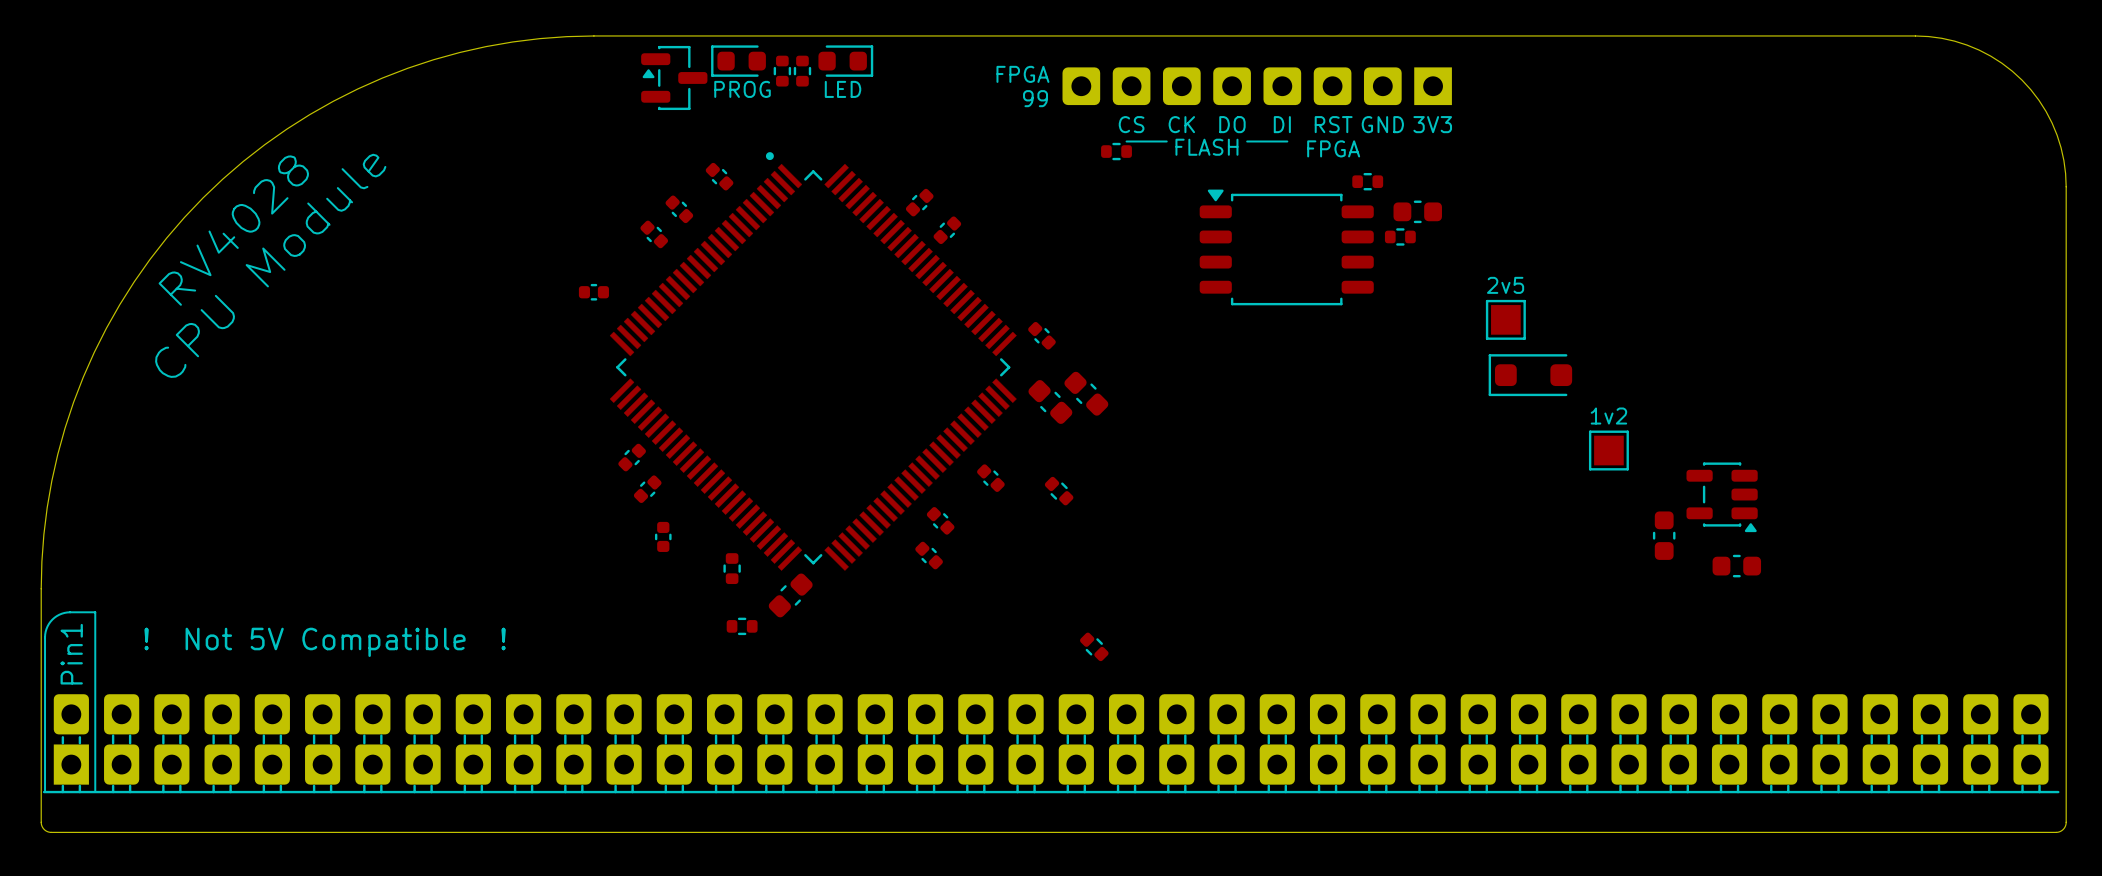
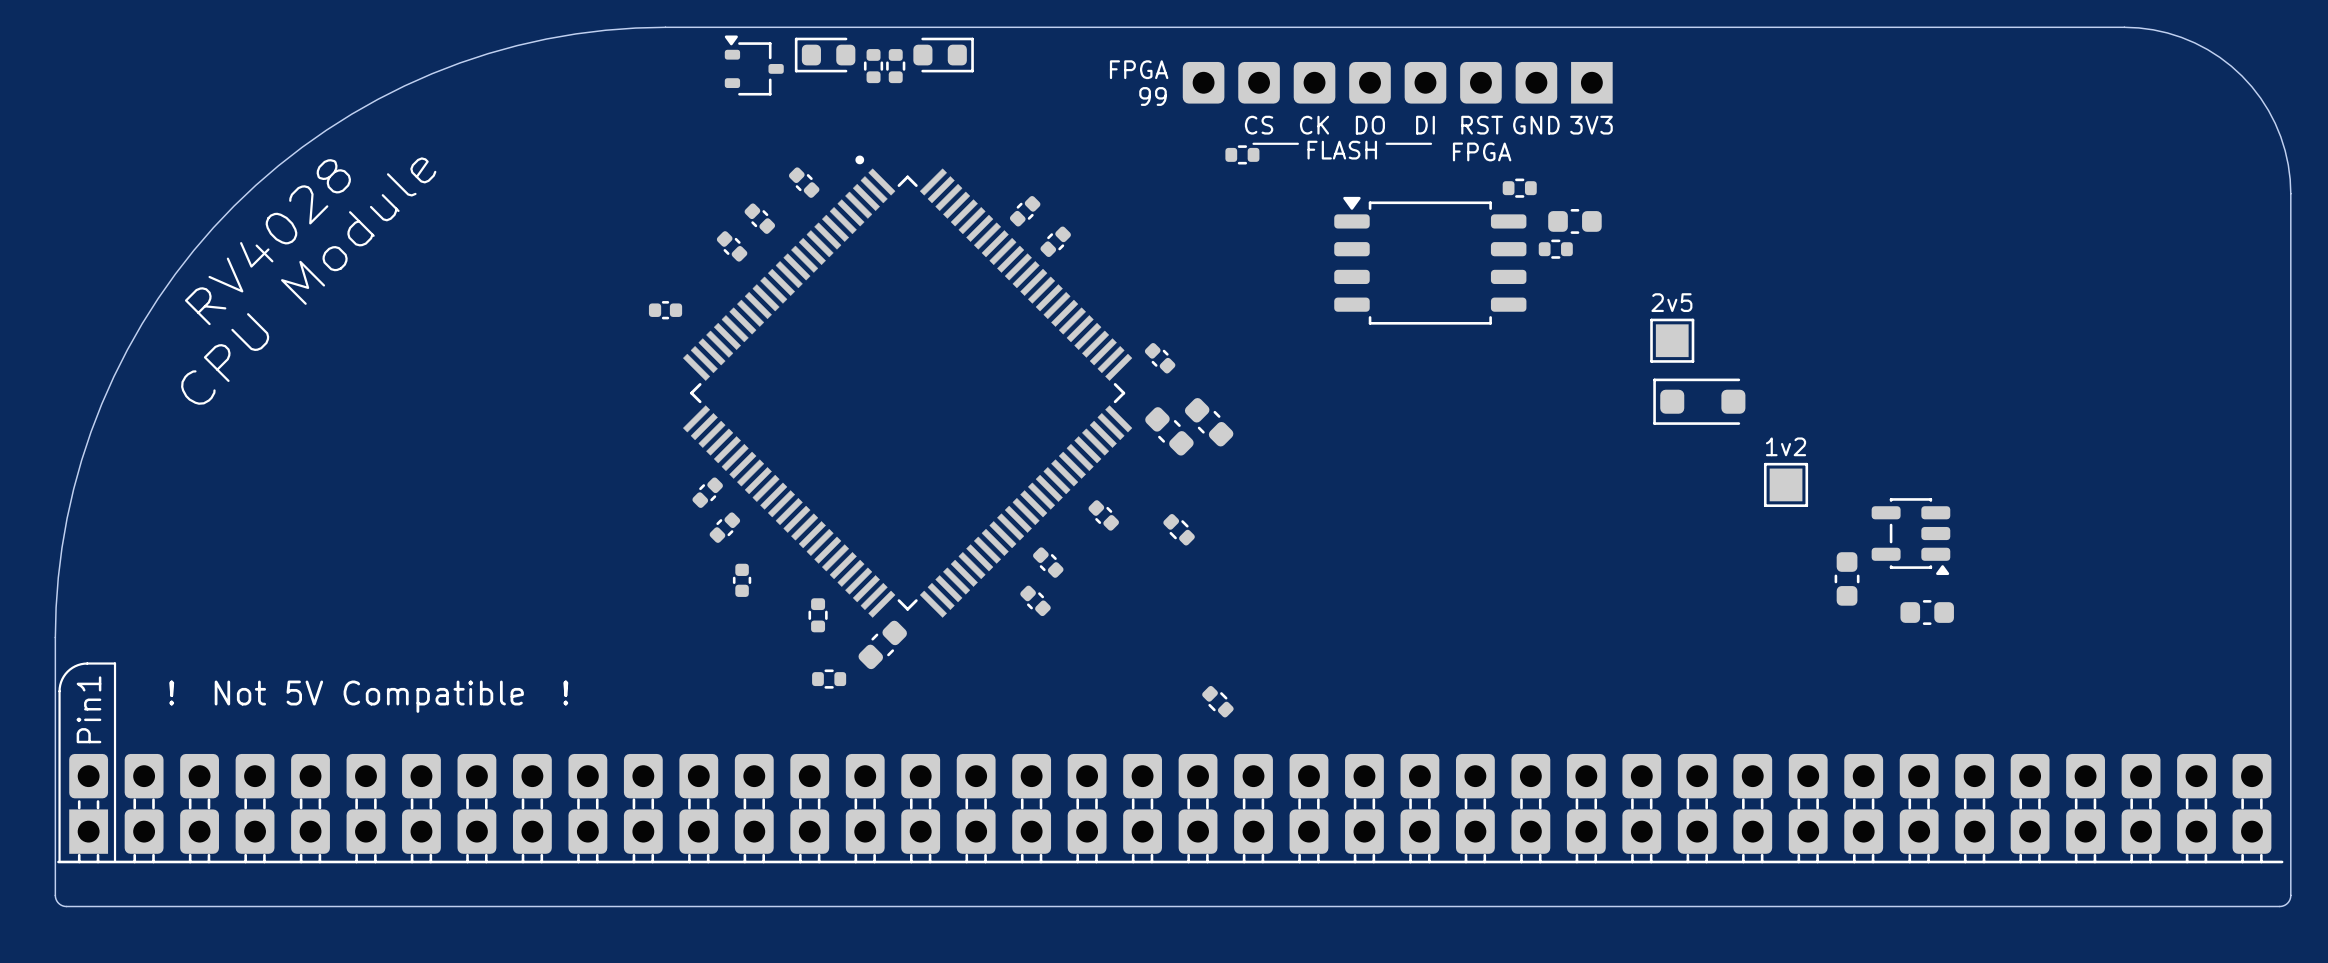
part footprint: [641, 45, 708, 111] -> [724, 35, 784, 96]
text: PROG (742, 89) -> none
text: LED (843, 89) -> none

